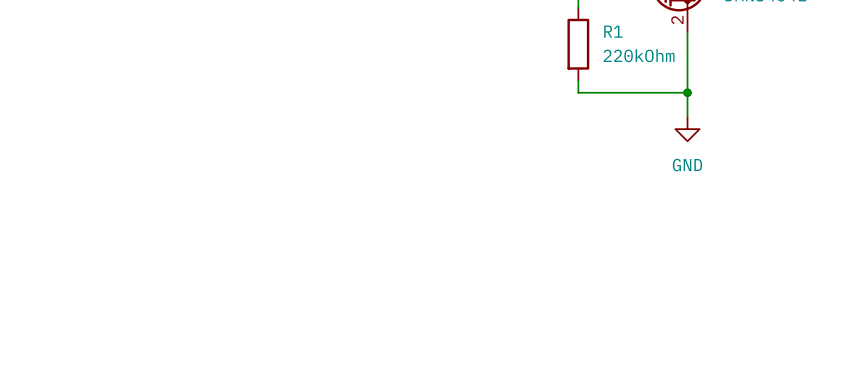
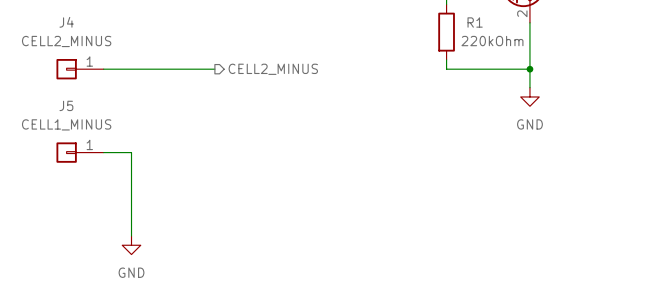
J4: none -> CELL2_MINUS (80, 69)
wire: none -> (103, 69) (214, 69)
hierarchical label: none -> CELL2_MINUS (273, 69)
J5: none -> CELL1_MINUS (80, 152)
wire: none -> (103, 152) (131, 152) (131, 235)
power symbol: none -> GND (131, 245)

